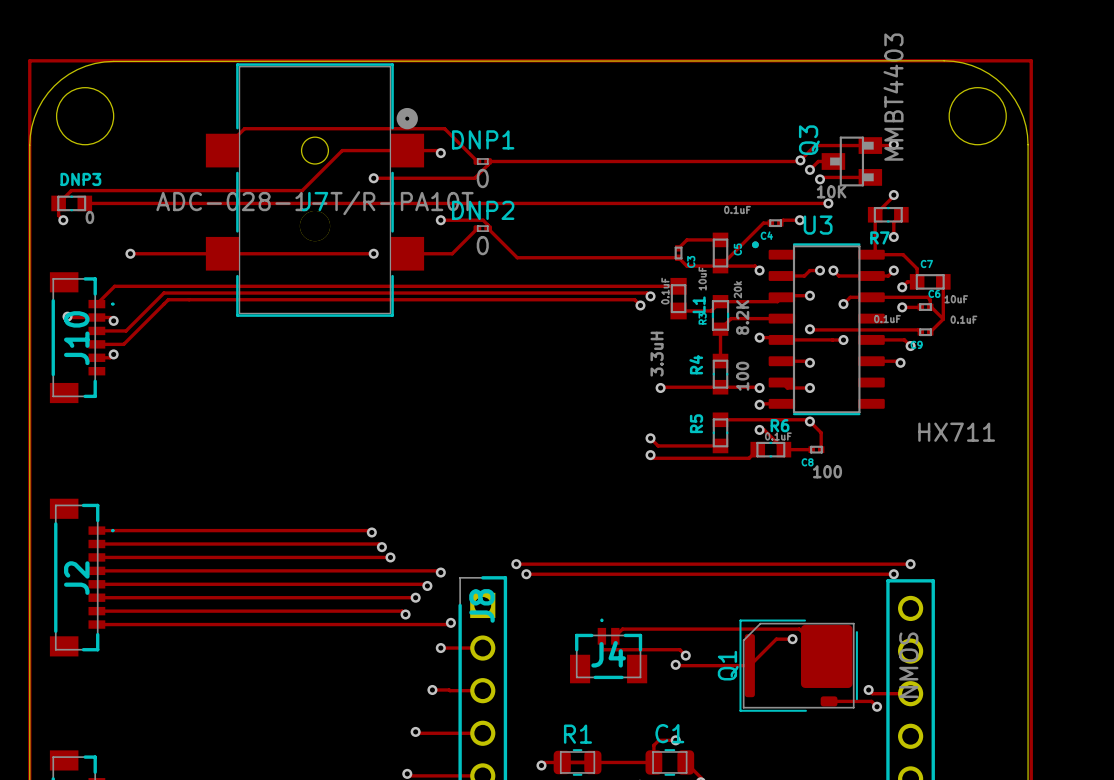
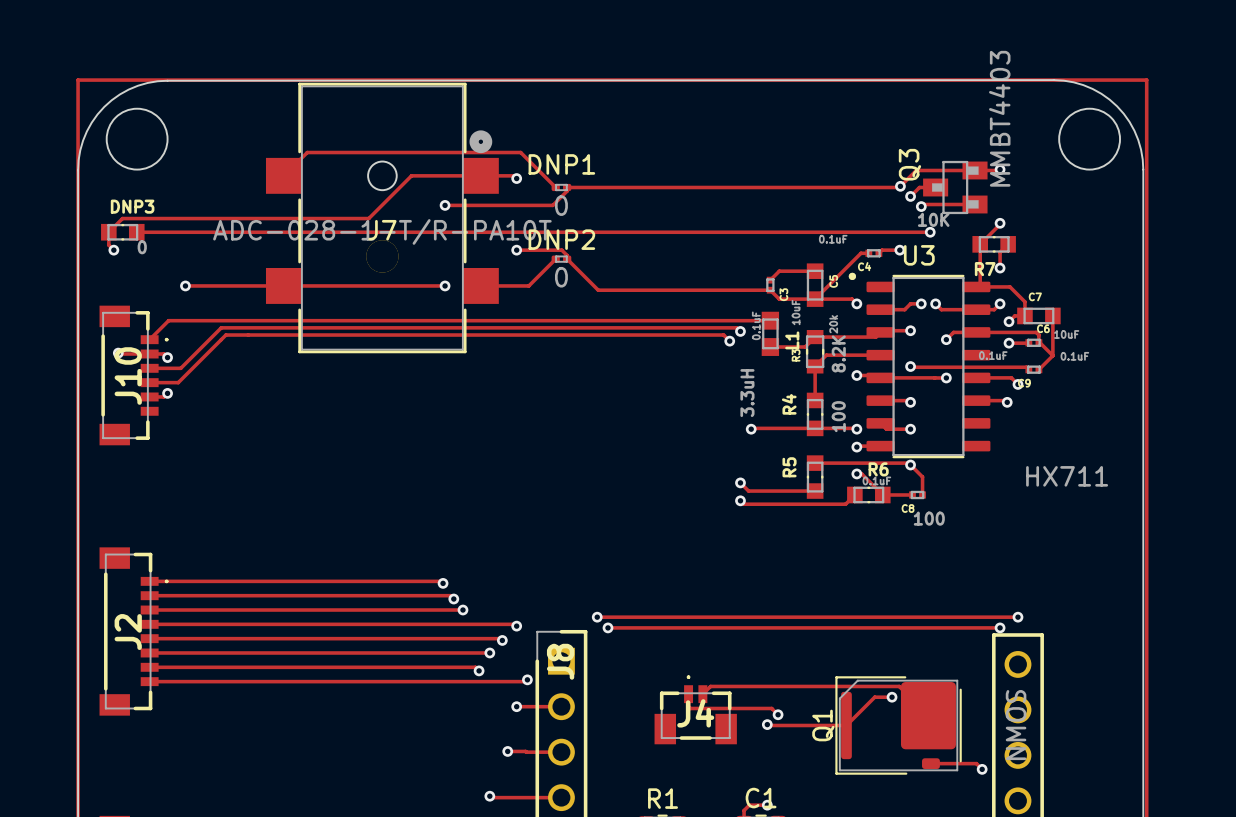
track: (868, 689) (872, 693) (910, 693) -> none
via: (868, 689) -> none

